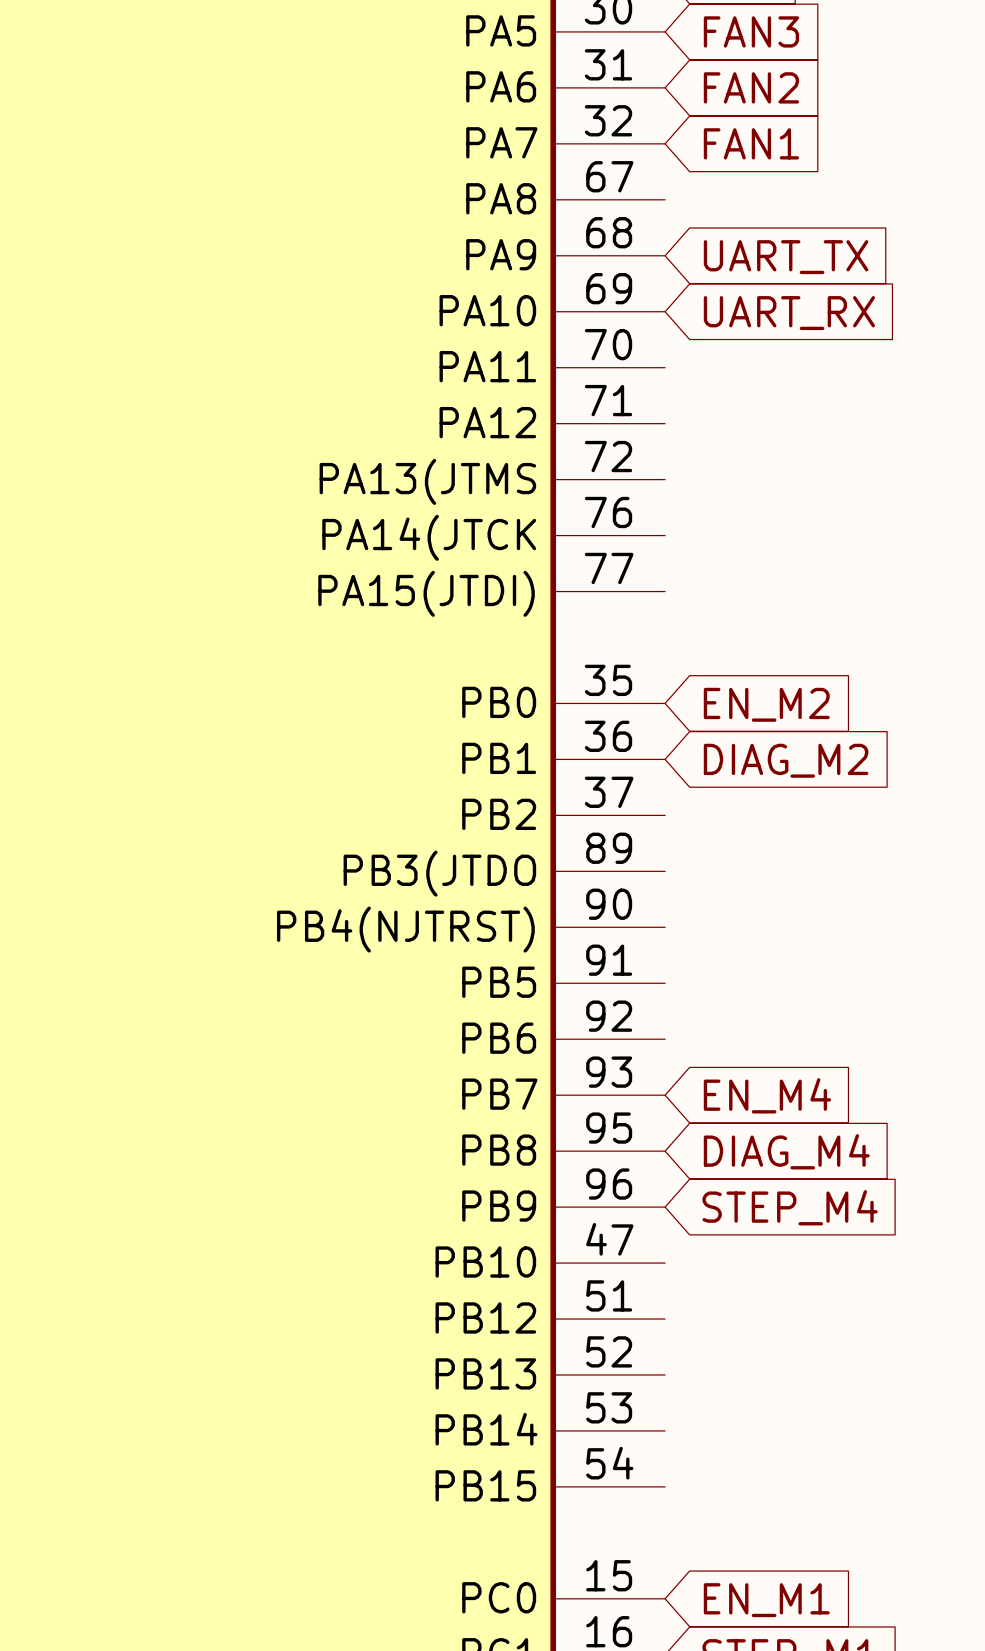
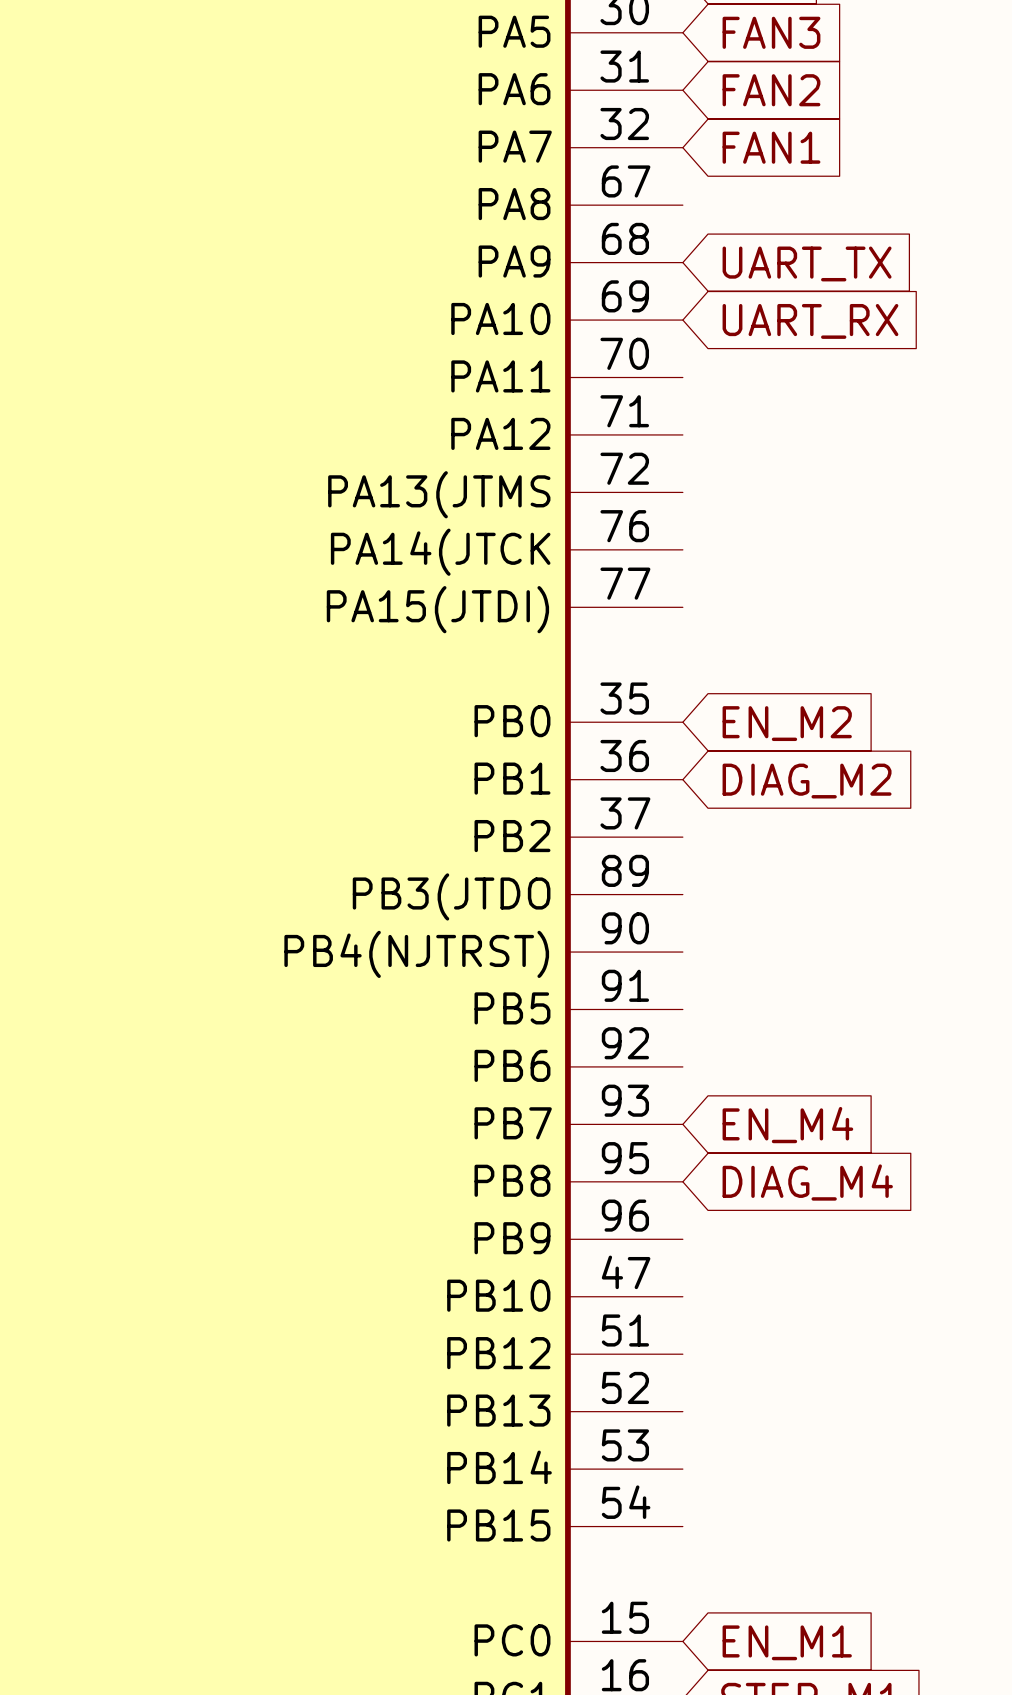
global label: STEP_M4 (790, 1207) -> none

